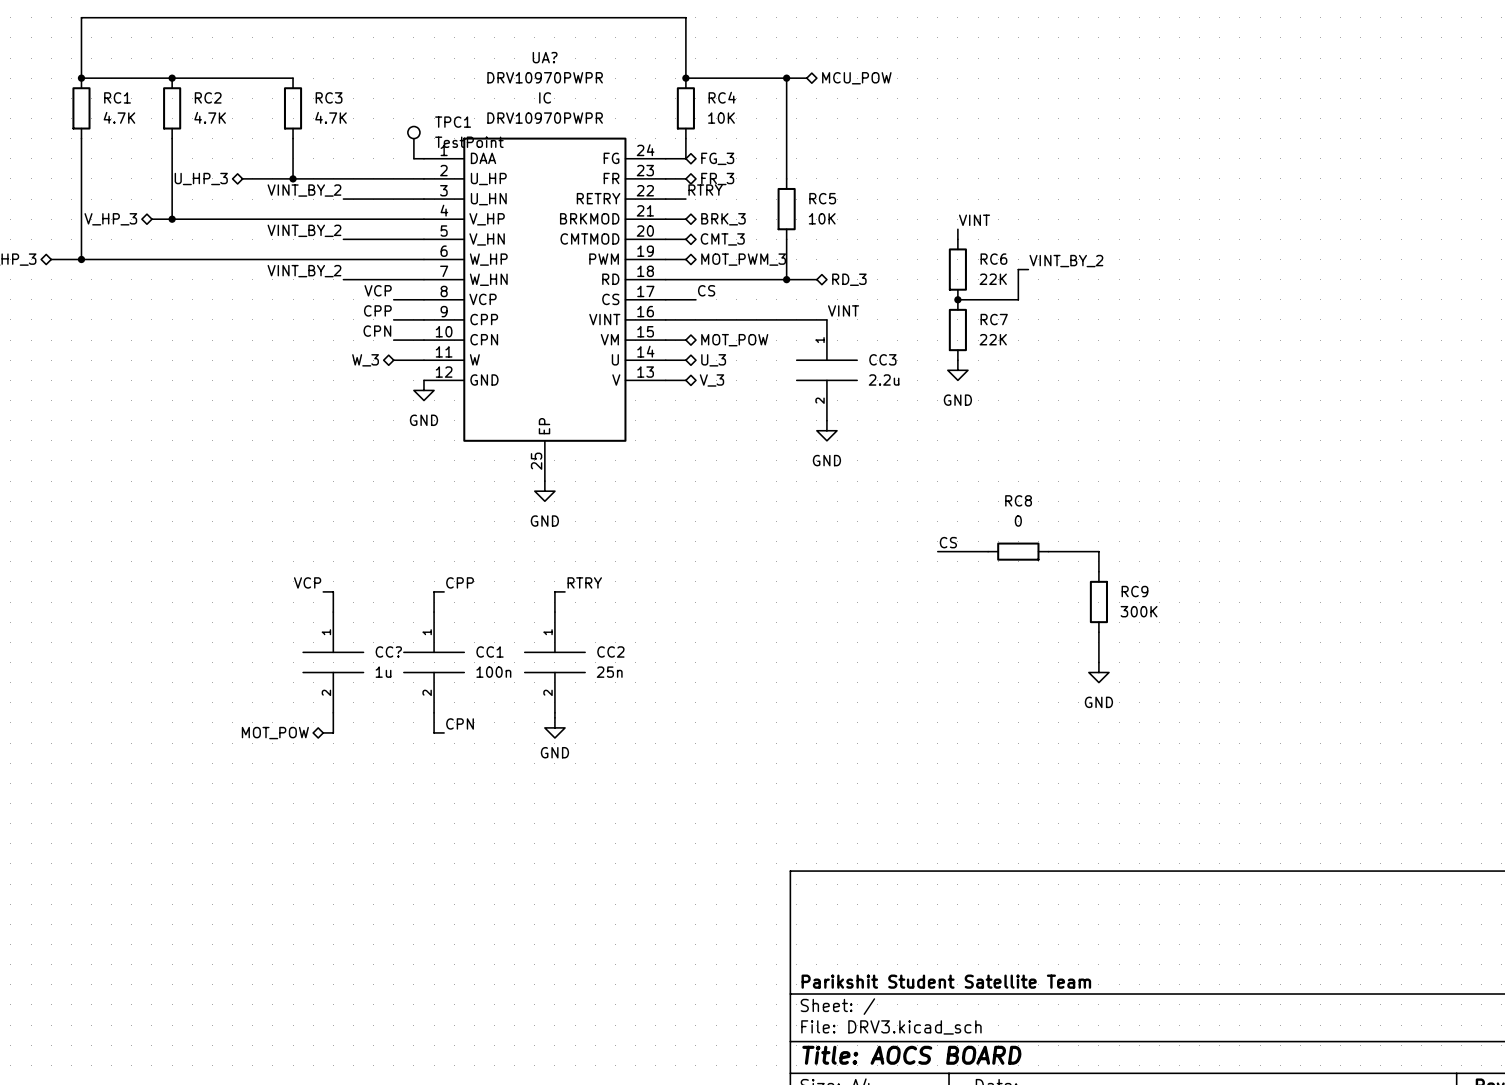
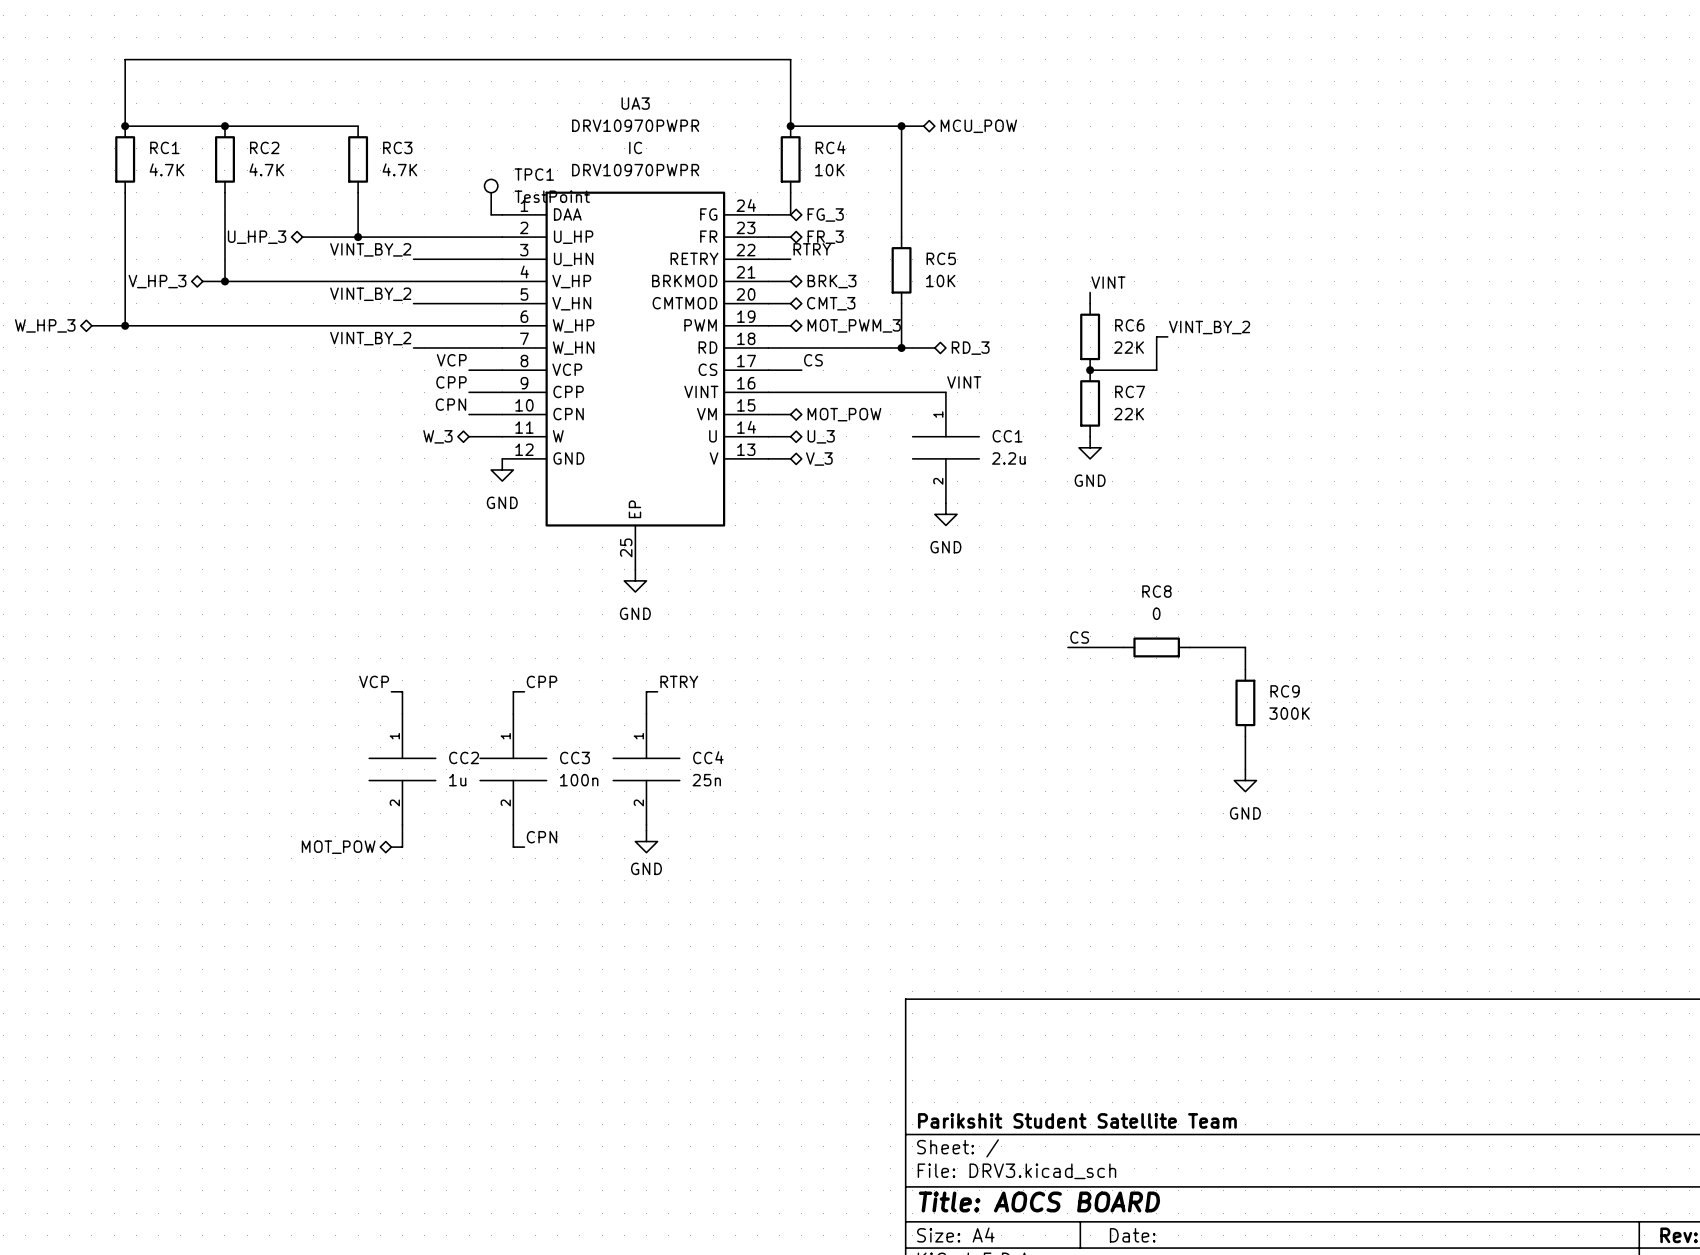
UA? name: UA? (545, 57) -> UA3 (635, 103)
CC3 name: CC3 (882, 359) -> CC1 (1007, 436)
CC? name: CC? (388, 651) -> CC2 (464, 757)
CC1 name: CC1 (490, 651) -> CC3 (574, 757)
CC2 name: CC2 (610, 651) -> CC4 (708, 757)

